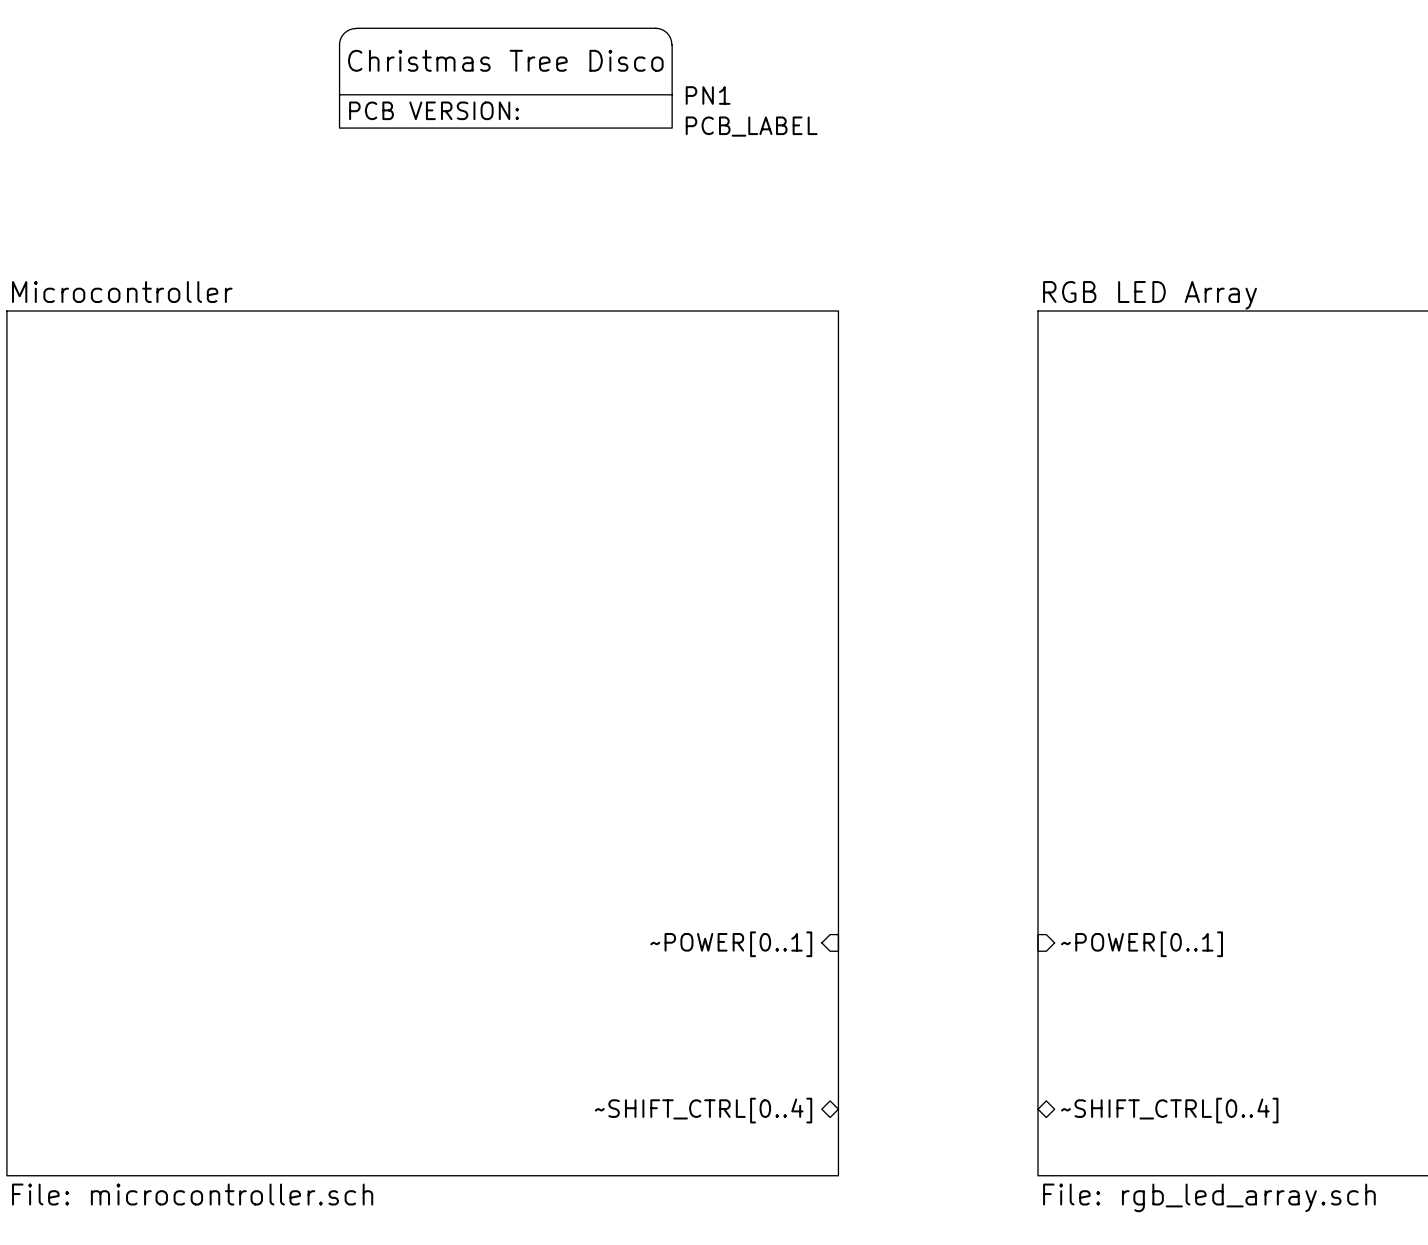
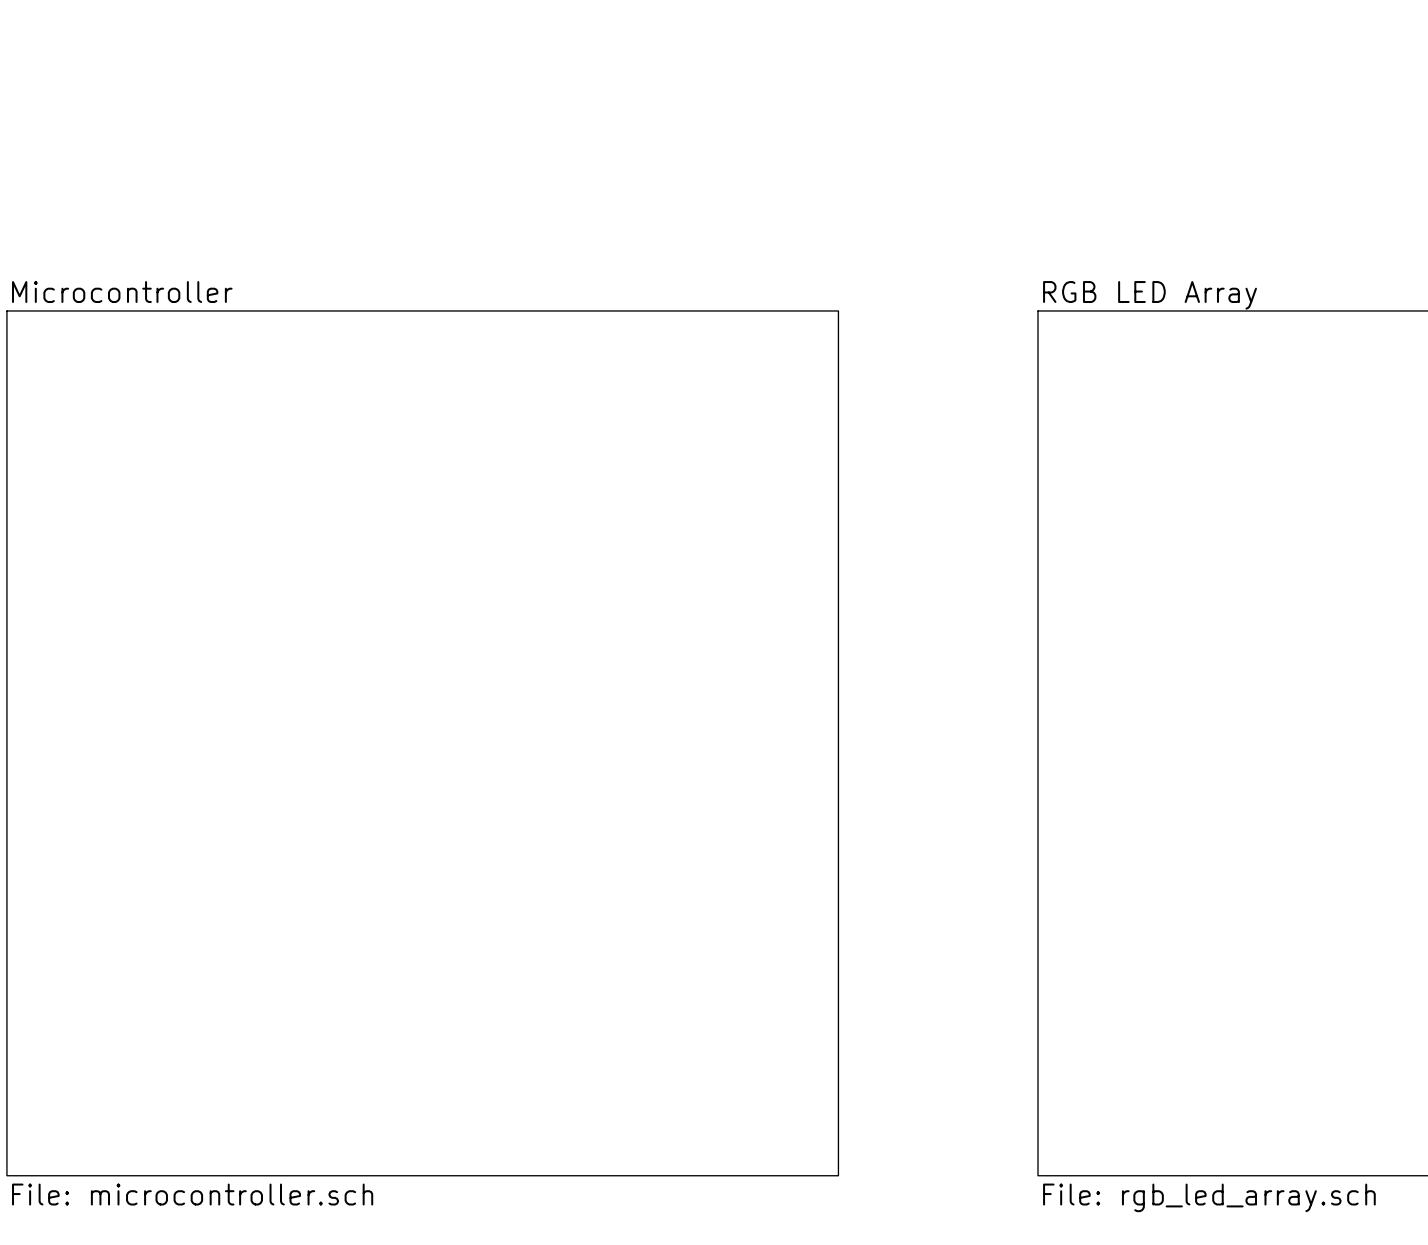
PN1: PCB_LABEL (505, 78) -> none
sheet pin: ~POWER[0..1] (731, 944) -> none
sheet pin: ~POWER[0..1] (1142, 944) -> none
sheet pin: ~SHIFT_CTRL[0..4] (703, 1110) -> none
sheet pin: ~SHIFT_CTRL[0..4] (1169, 1110) -> none

